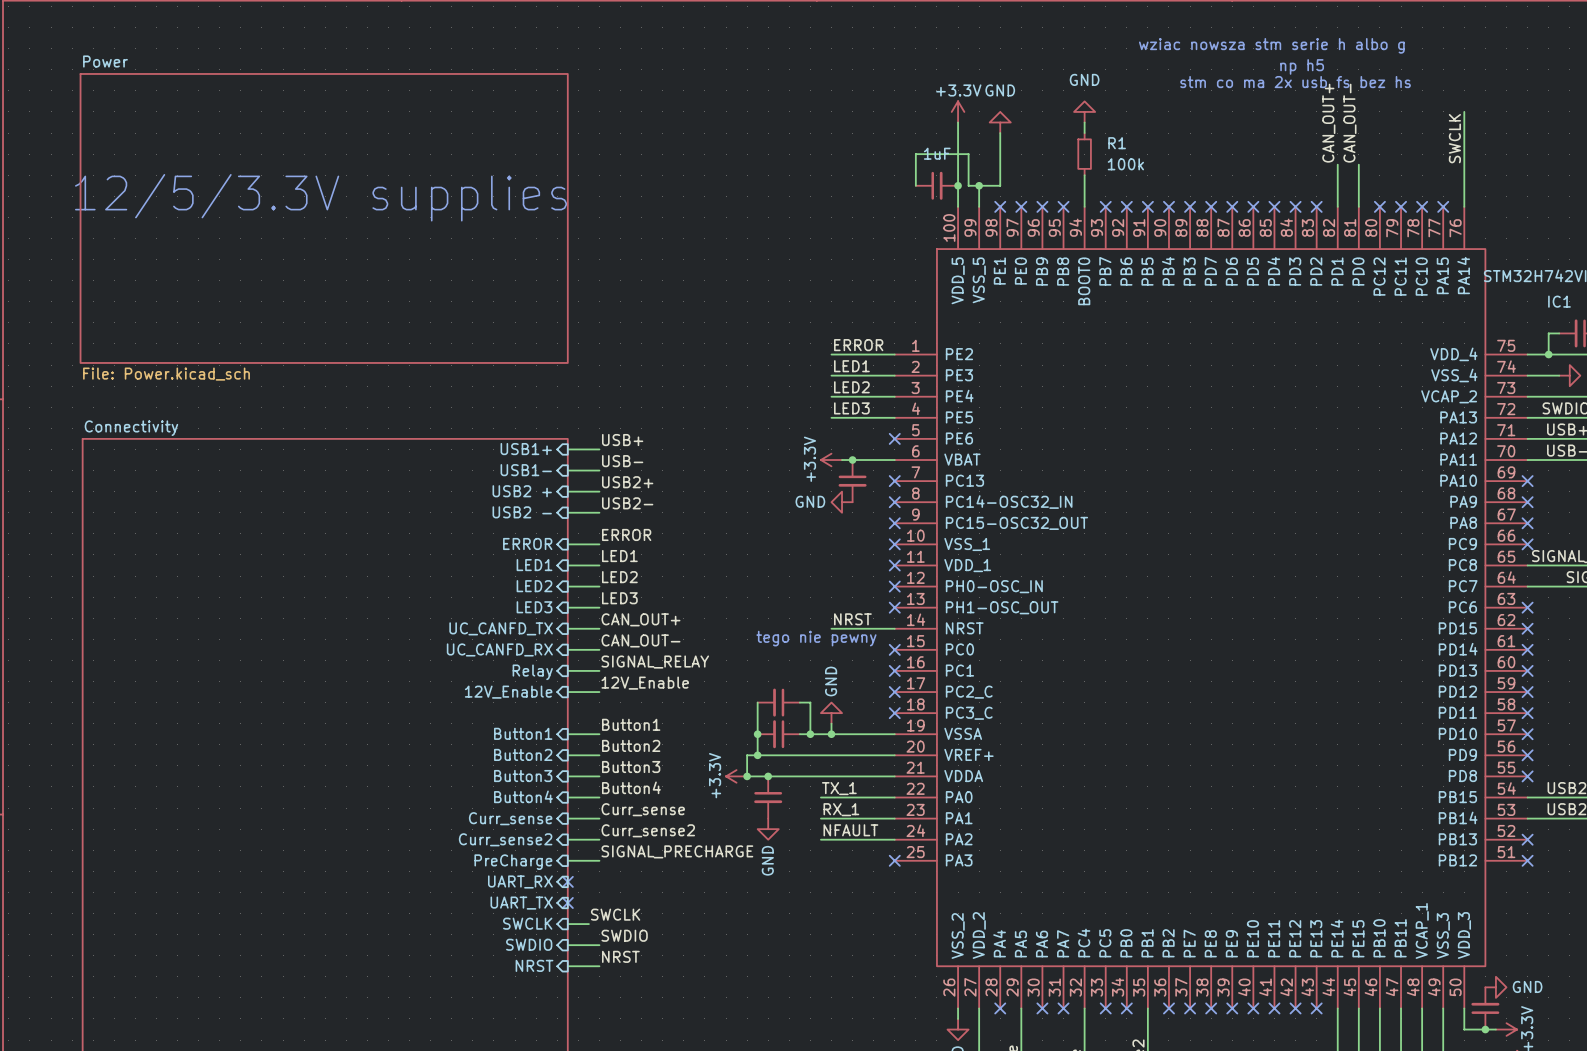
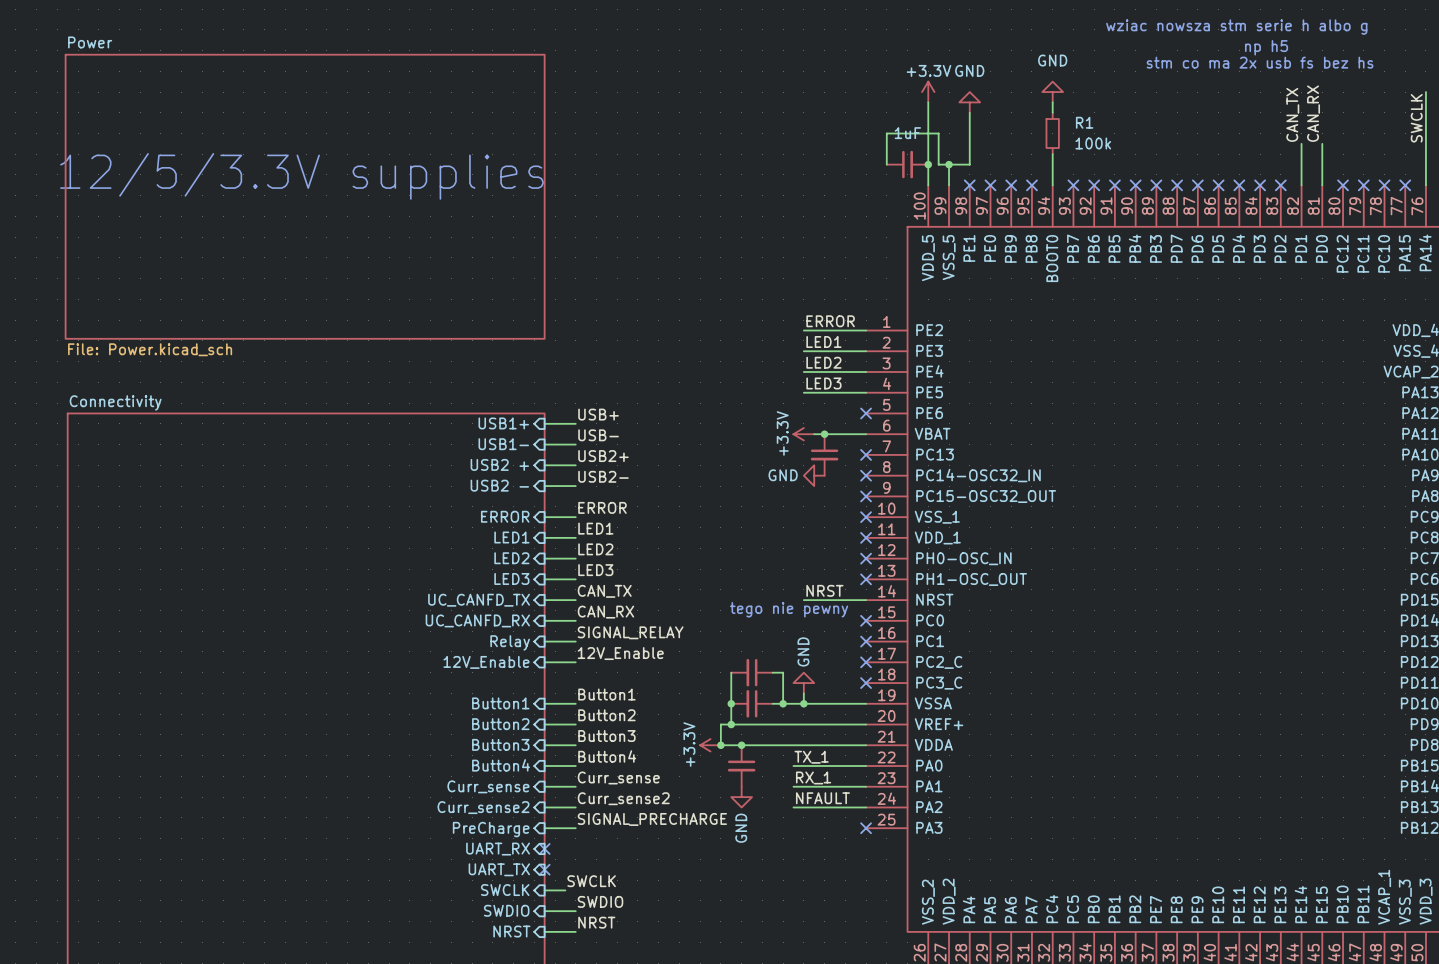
label: CAN_OUT+ (1328, 123) -> CAN_TX (1292, 114)
label: CAN_OUT- (1349, 123) -> CAN_RX (1313, 113)
label: CAN_OUT+ (640, 619) -> CAN_TX (604, 591)
label: CAN_OUT- (640, 640) -> CAN_RX (605, 612)

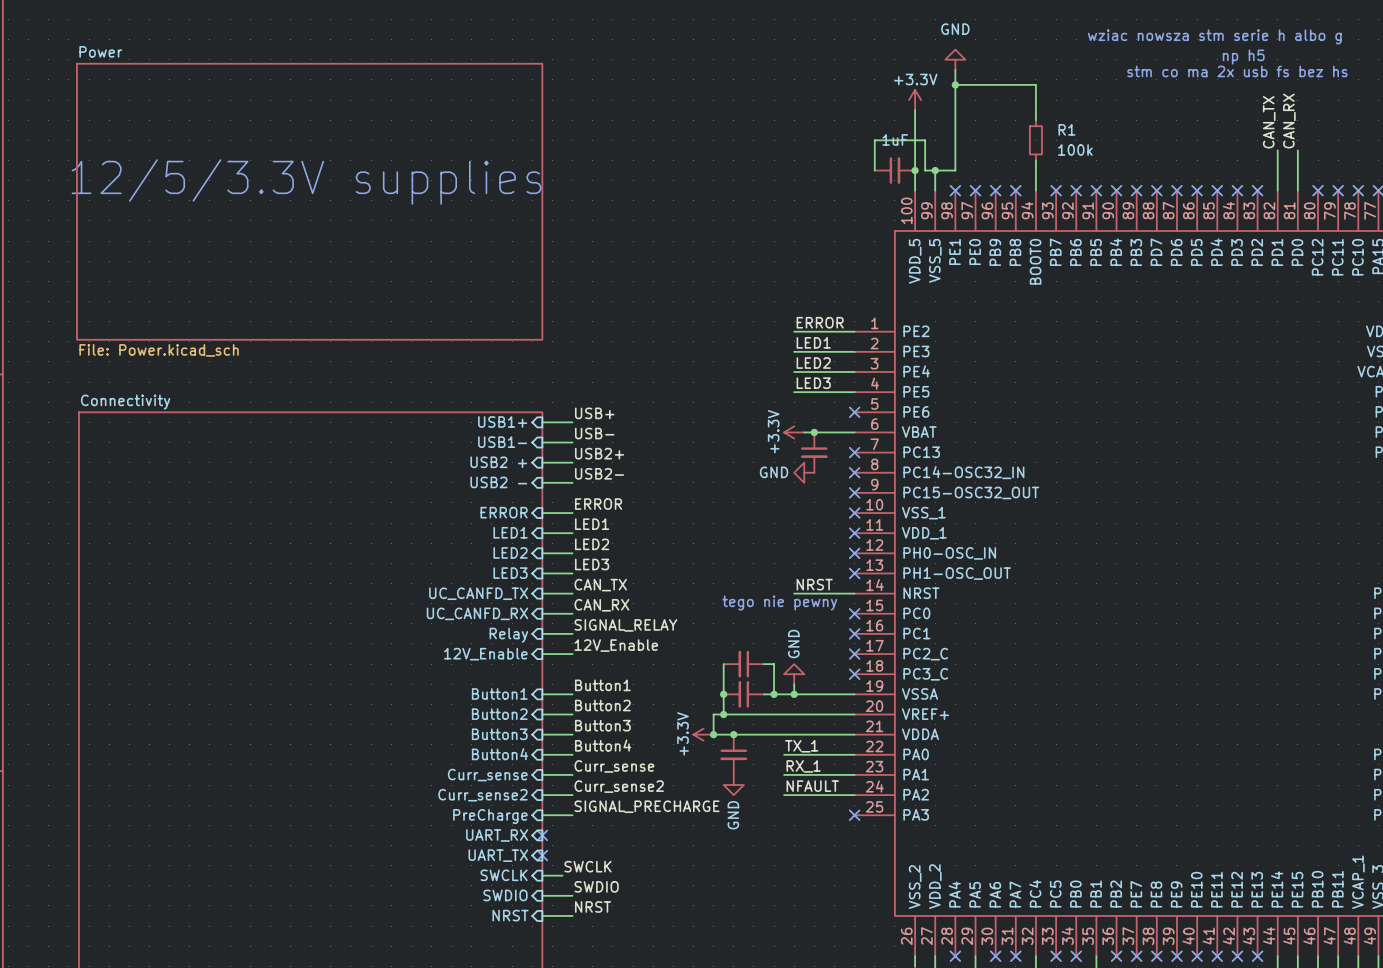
power symbol: none -> GND (955, 59)
wire: none -> (955, 69) (955, 120)
wire: none -> (955, 84) (1035, 84) (1035, 110)
junction: none -> (955, 84)
power symbol: GND (1052, 92) -> none
power symbol: GND (969, 102) -> none

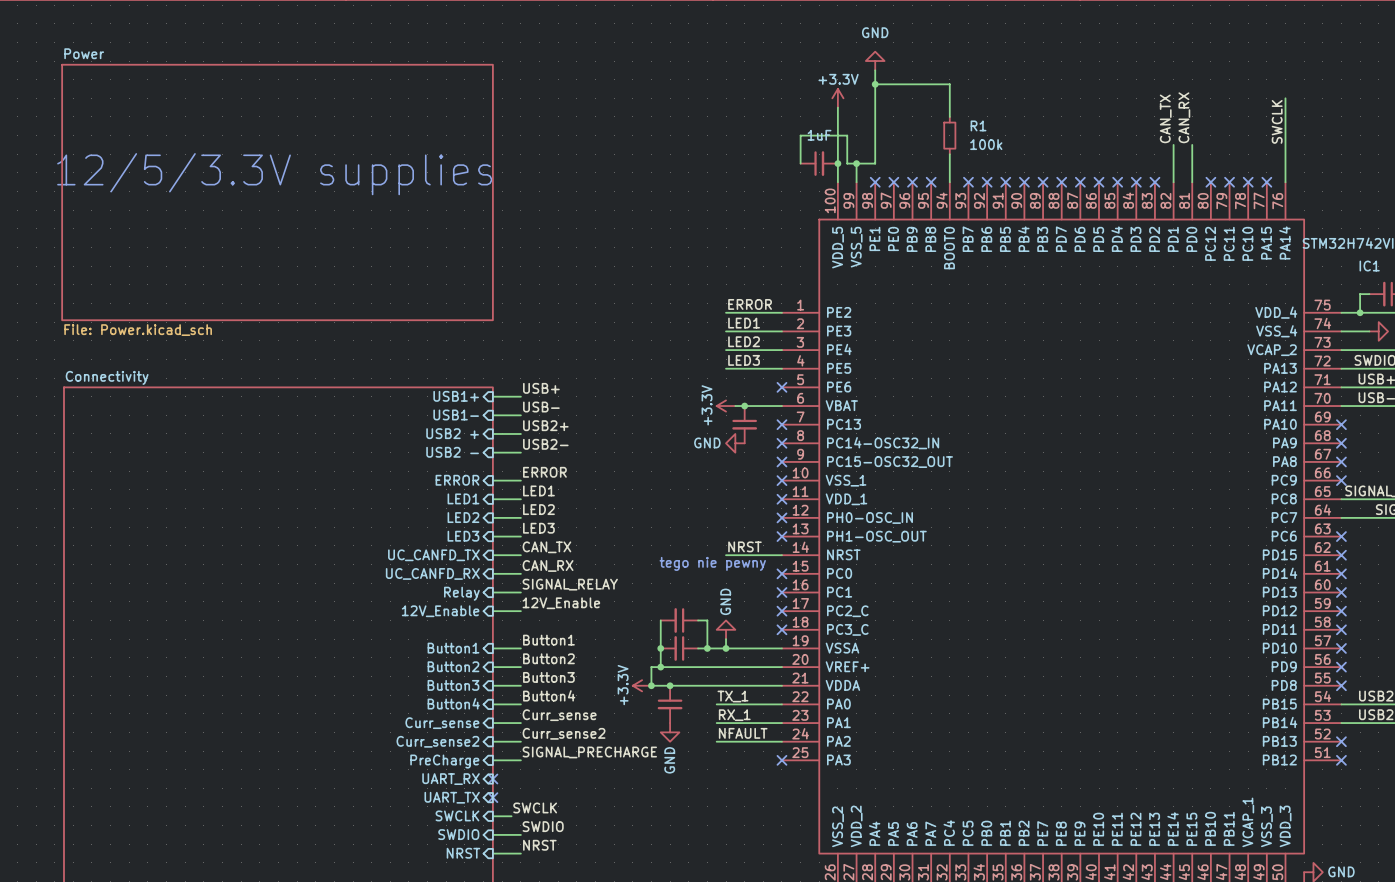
text: wziac nowsza stm serie h albo g (1214, 36) -> none
text: np h5 (1243, 57) -> none
text: stm co ma 2x usb fs bez hs (1237, 71) -> none

